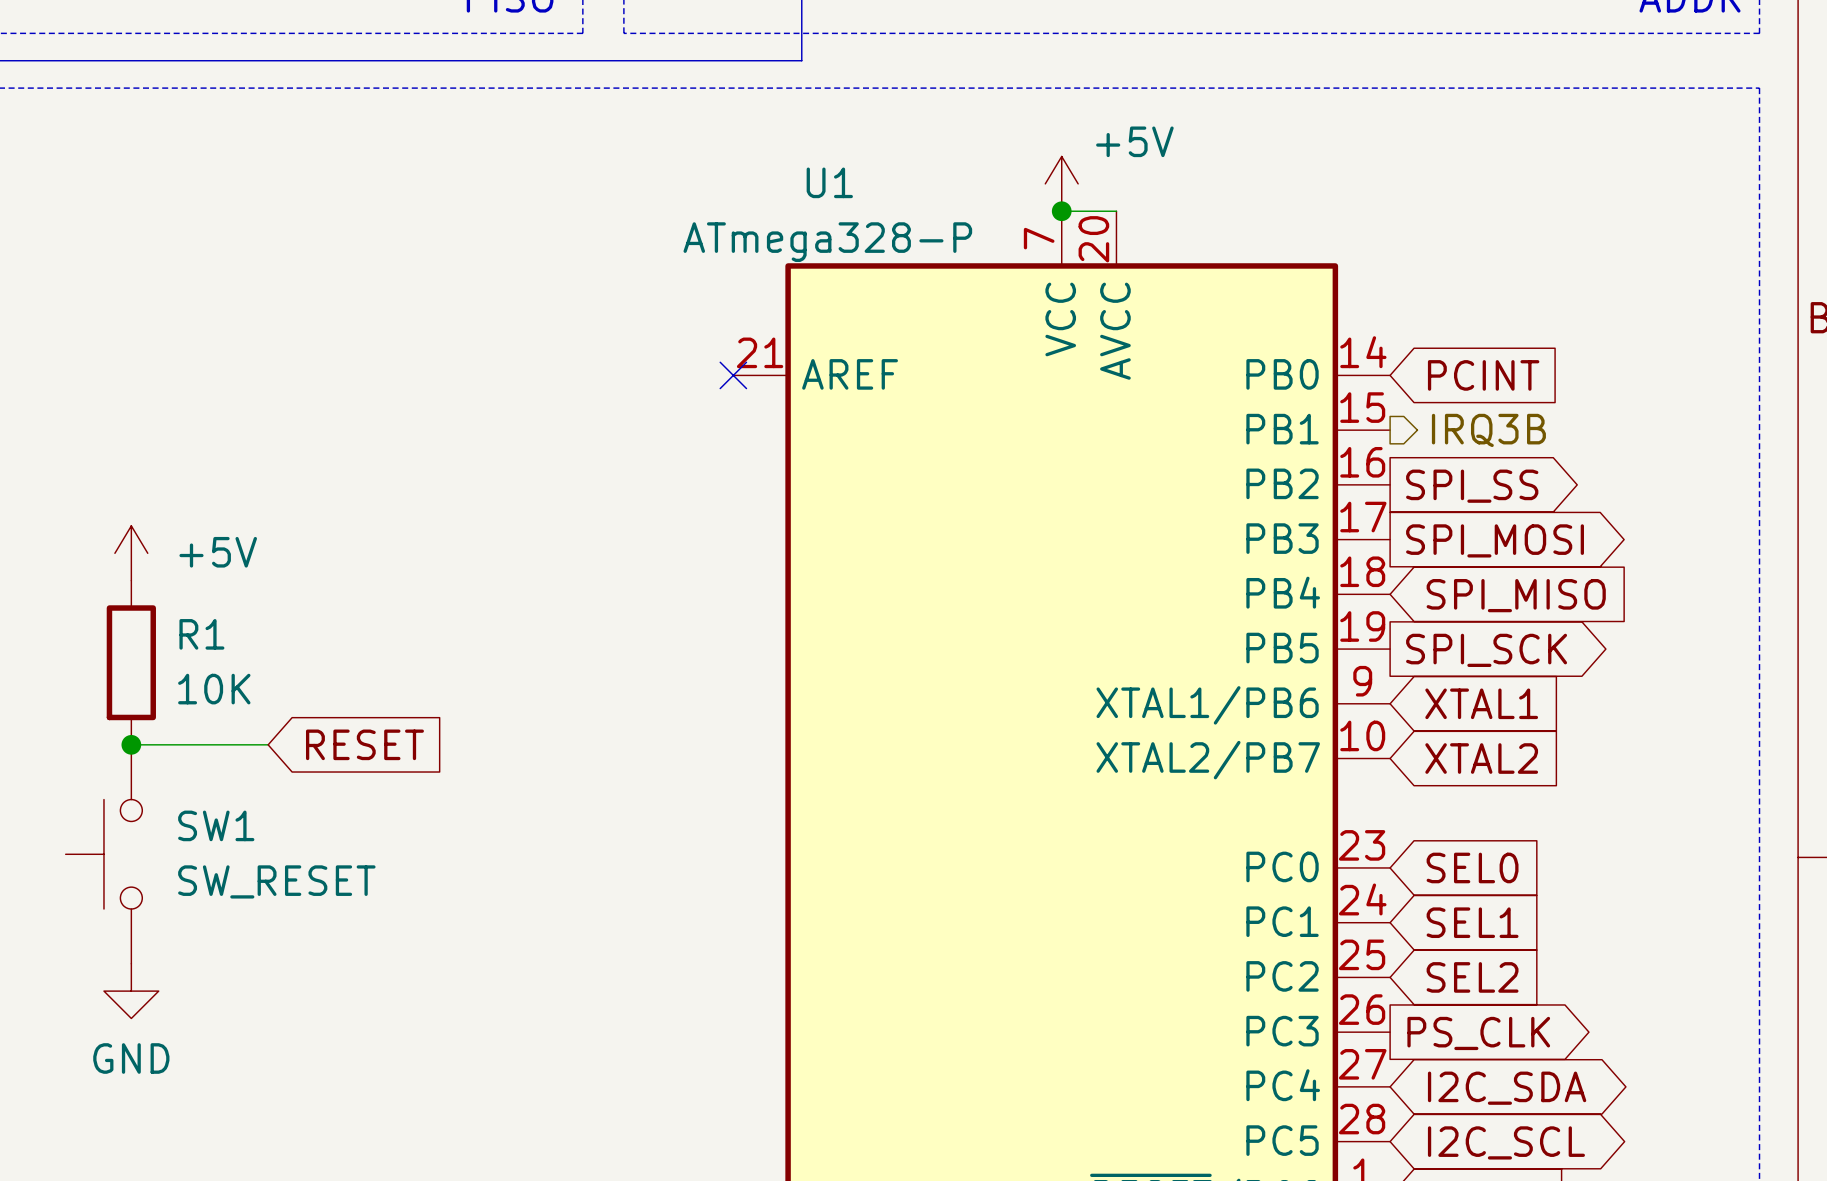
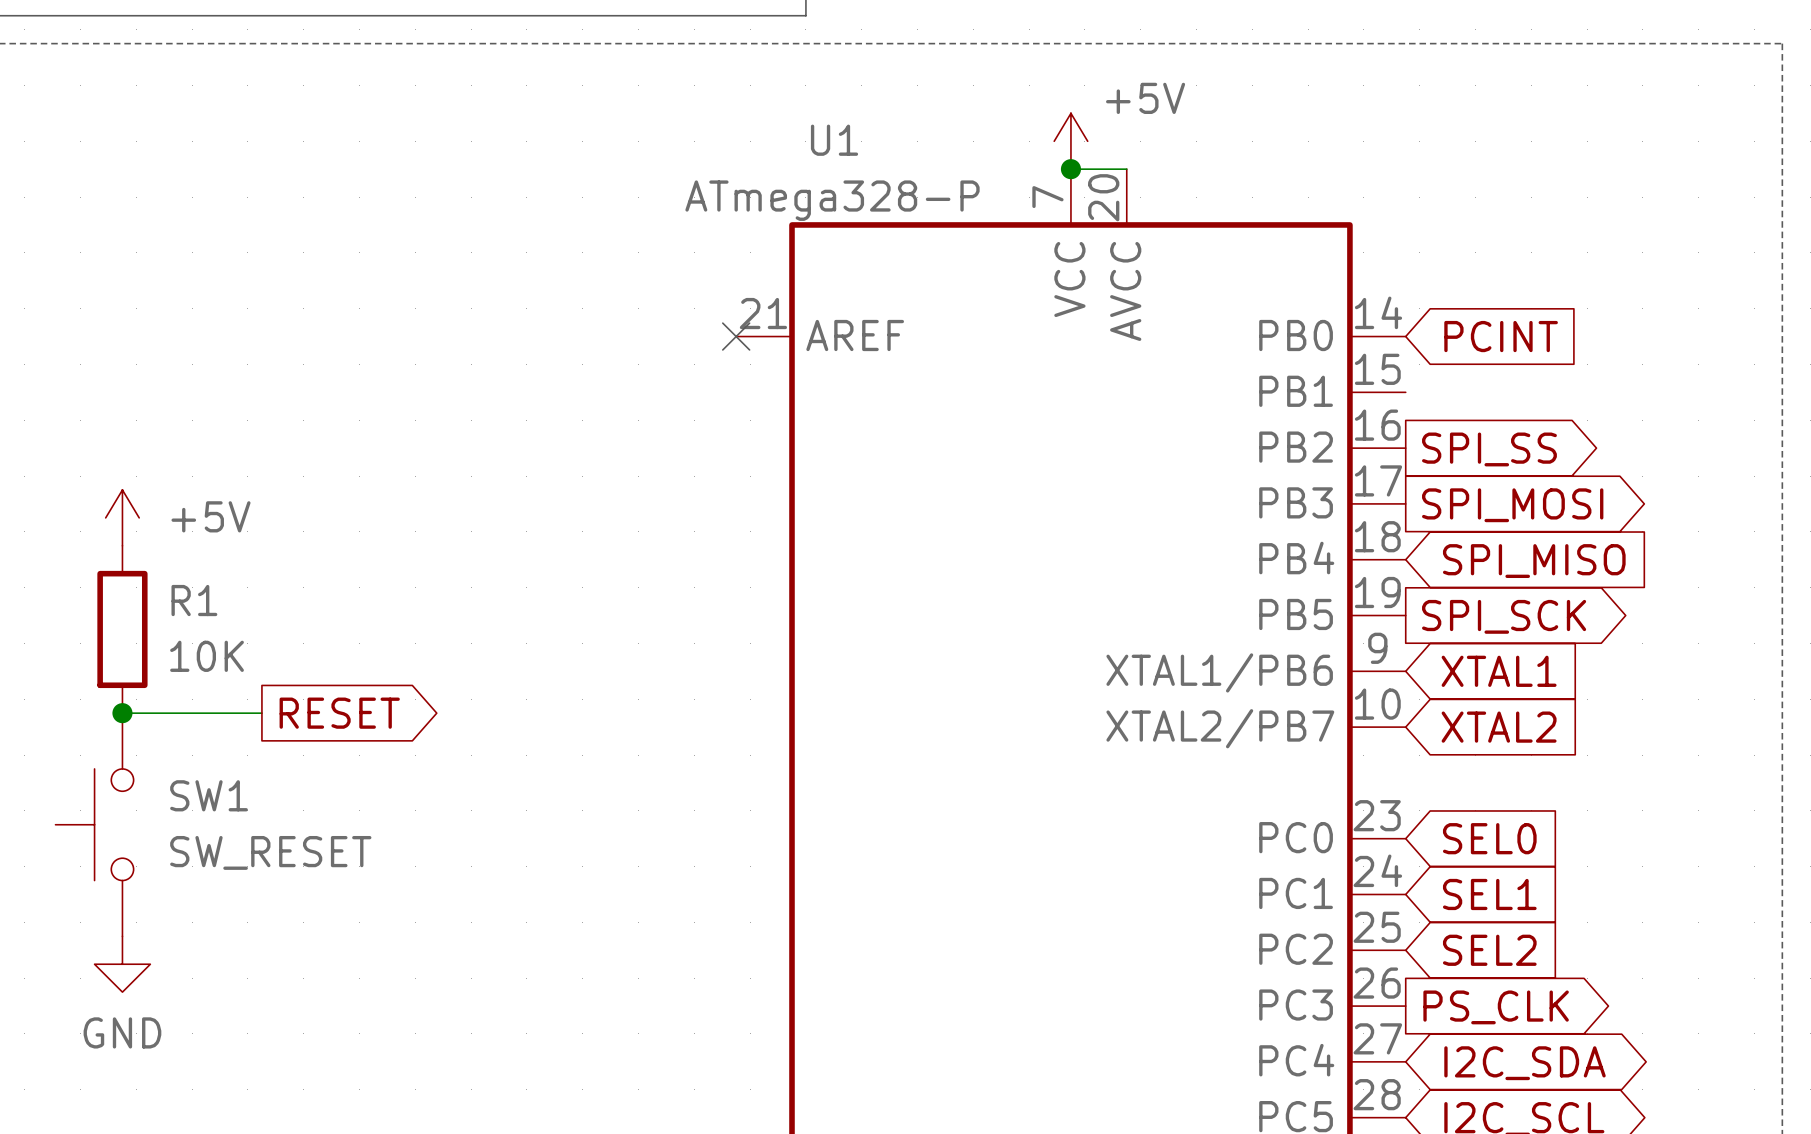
hierarchical label: IRQ3B (1488, 430) -> none
global label shape: input (364, 744) -> output (339, 713)

